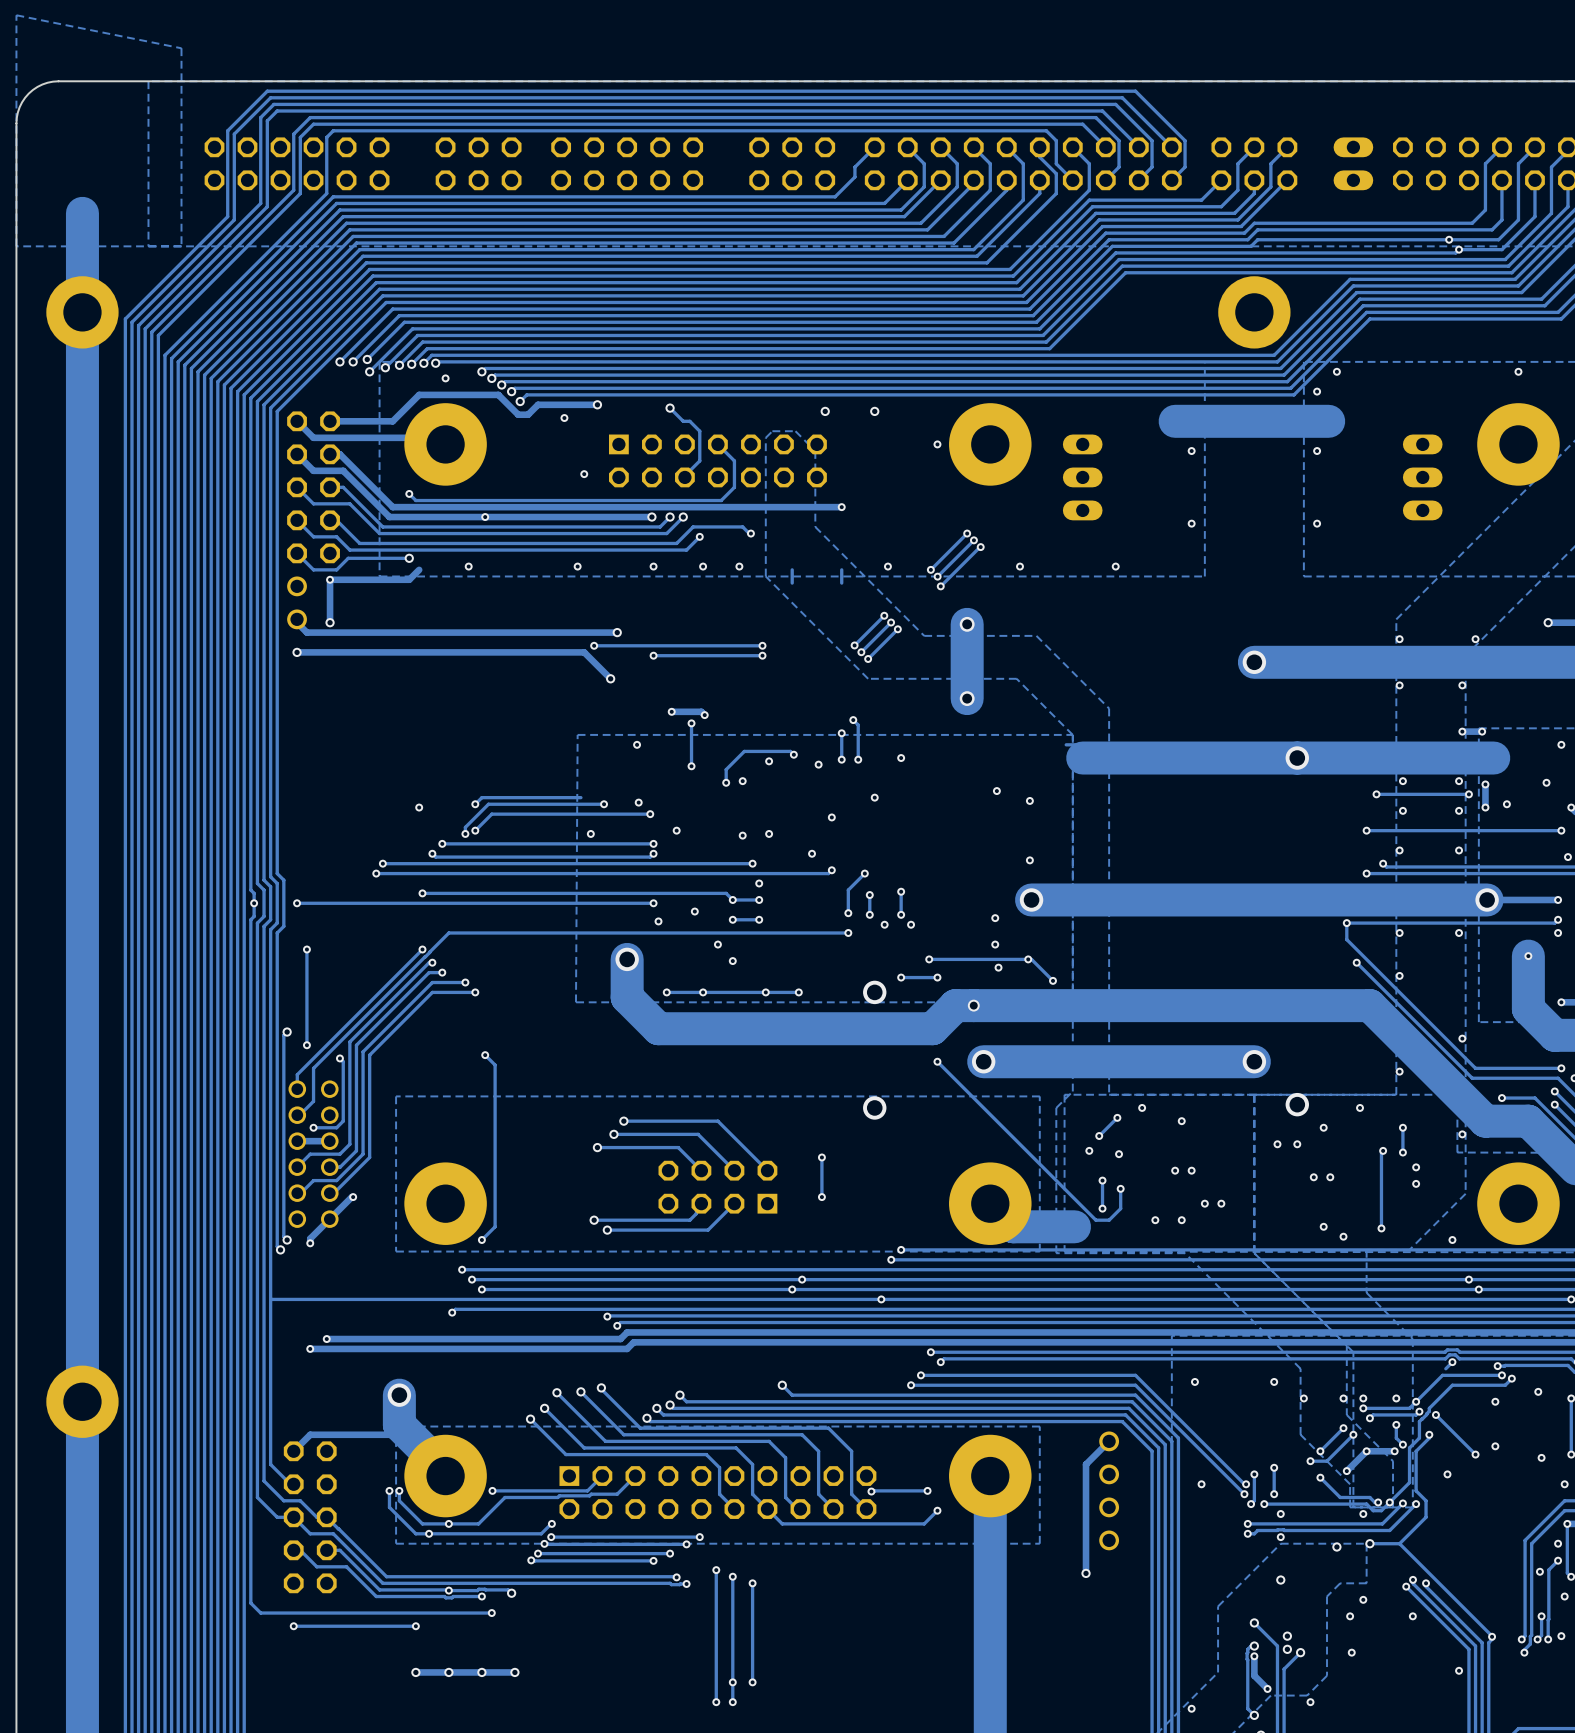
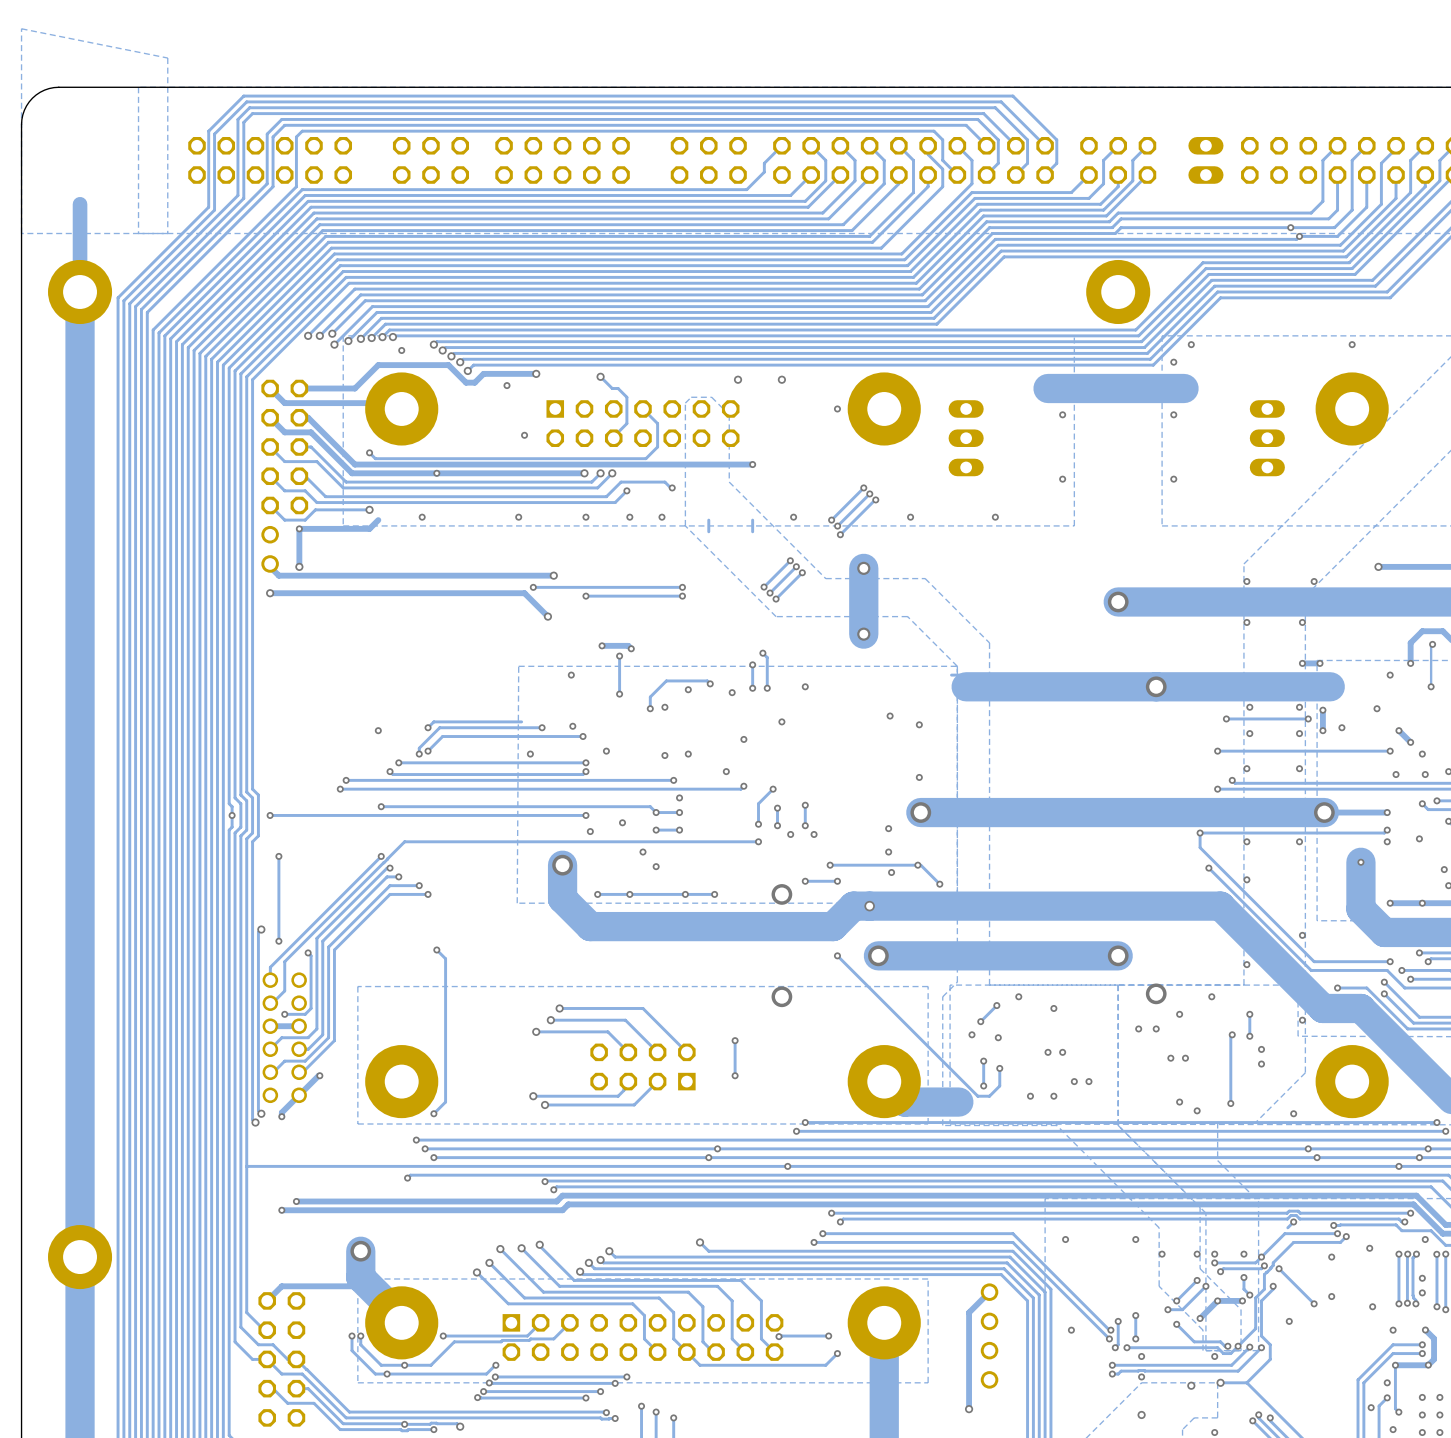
track width: thick (82, 213) (82, 312) -> thin (80, 204) (80, 291)

